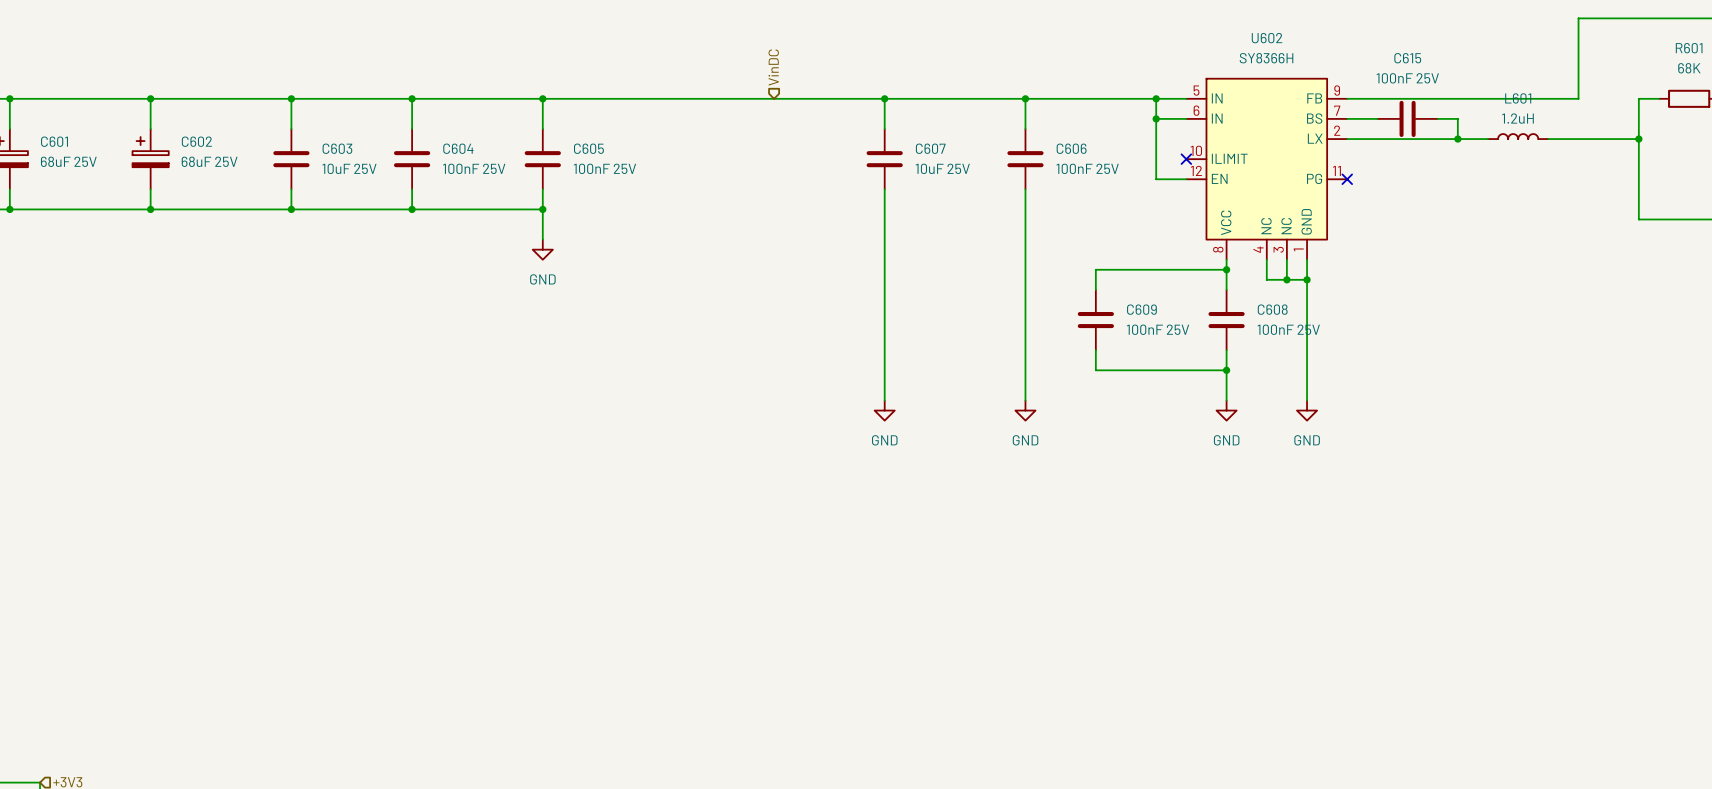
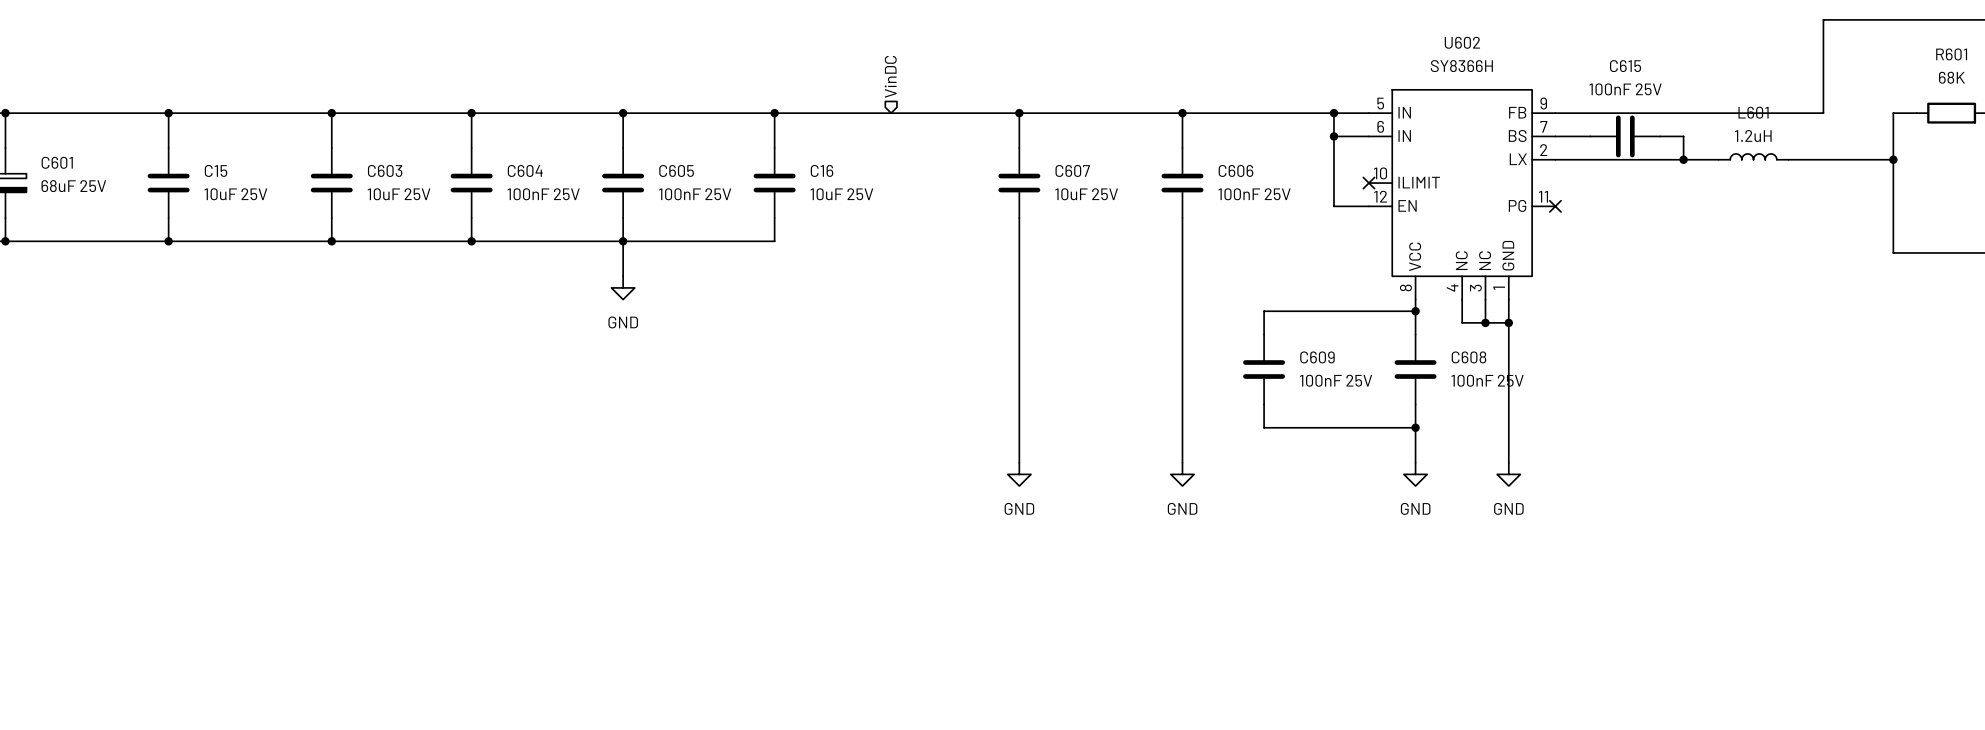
wire: none -> (774, 113) (774, 148)
junction: none -> (774, 113)
C602: 68uF 25V (150, 159) -> none
C15: none -> 10uF 25V (168, 183)
C16: none -> 10uF 25V (774, 183)
wire: none -> (774, 218) (774, 241) (623, 241)

